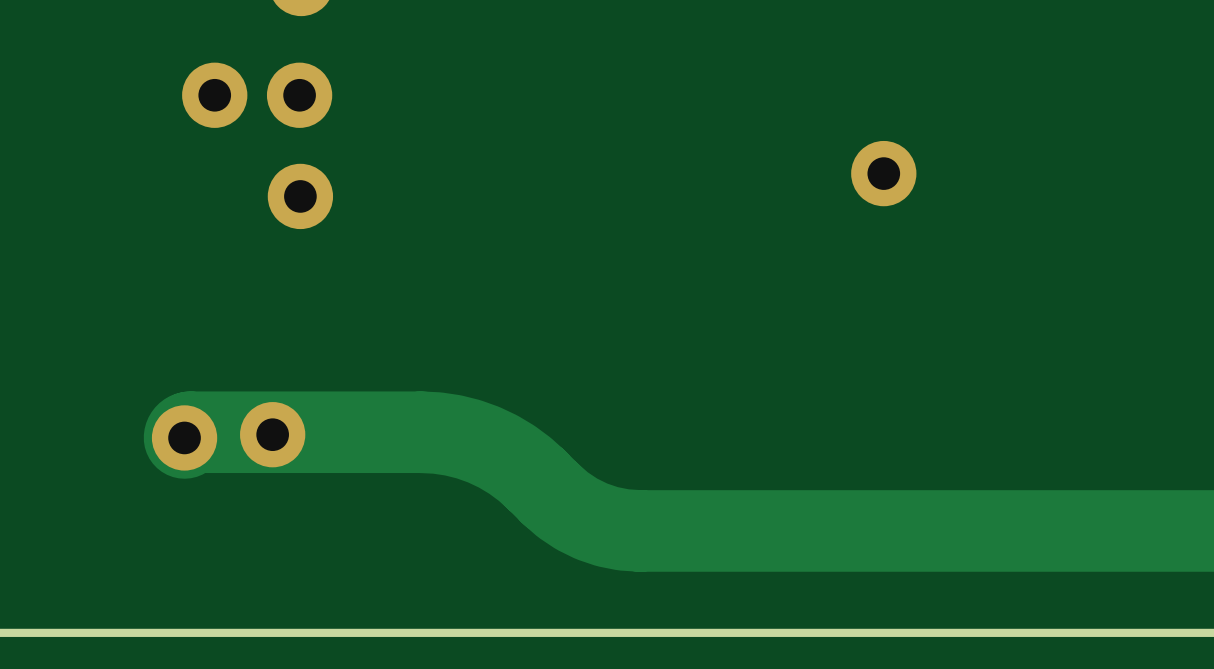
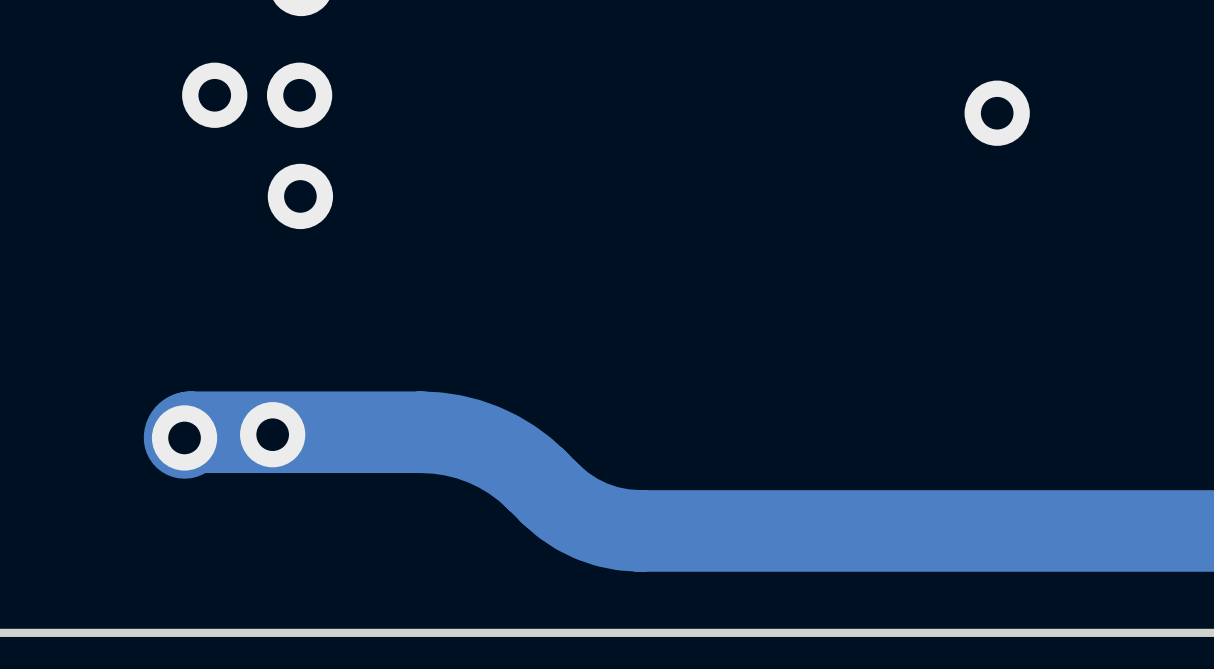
via position: (883, 173) -> (997, 113)

